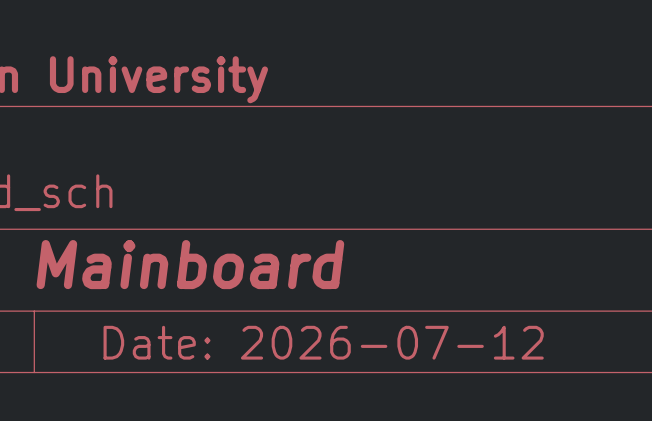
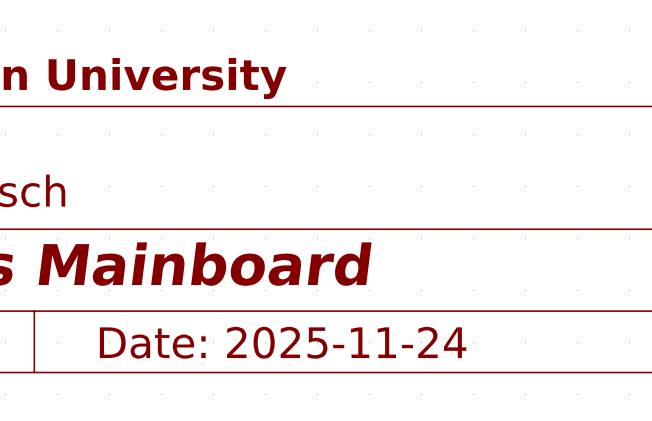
title block: Date: 2026-07-12 (323, 342) -> Date: 2025-11-24 (283, 342)

